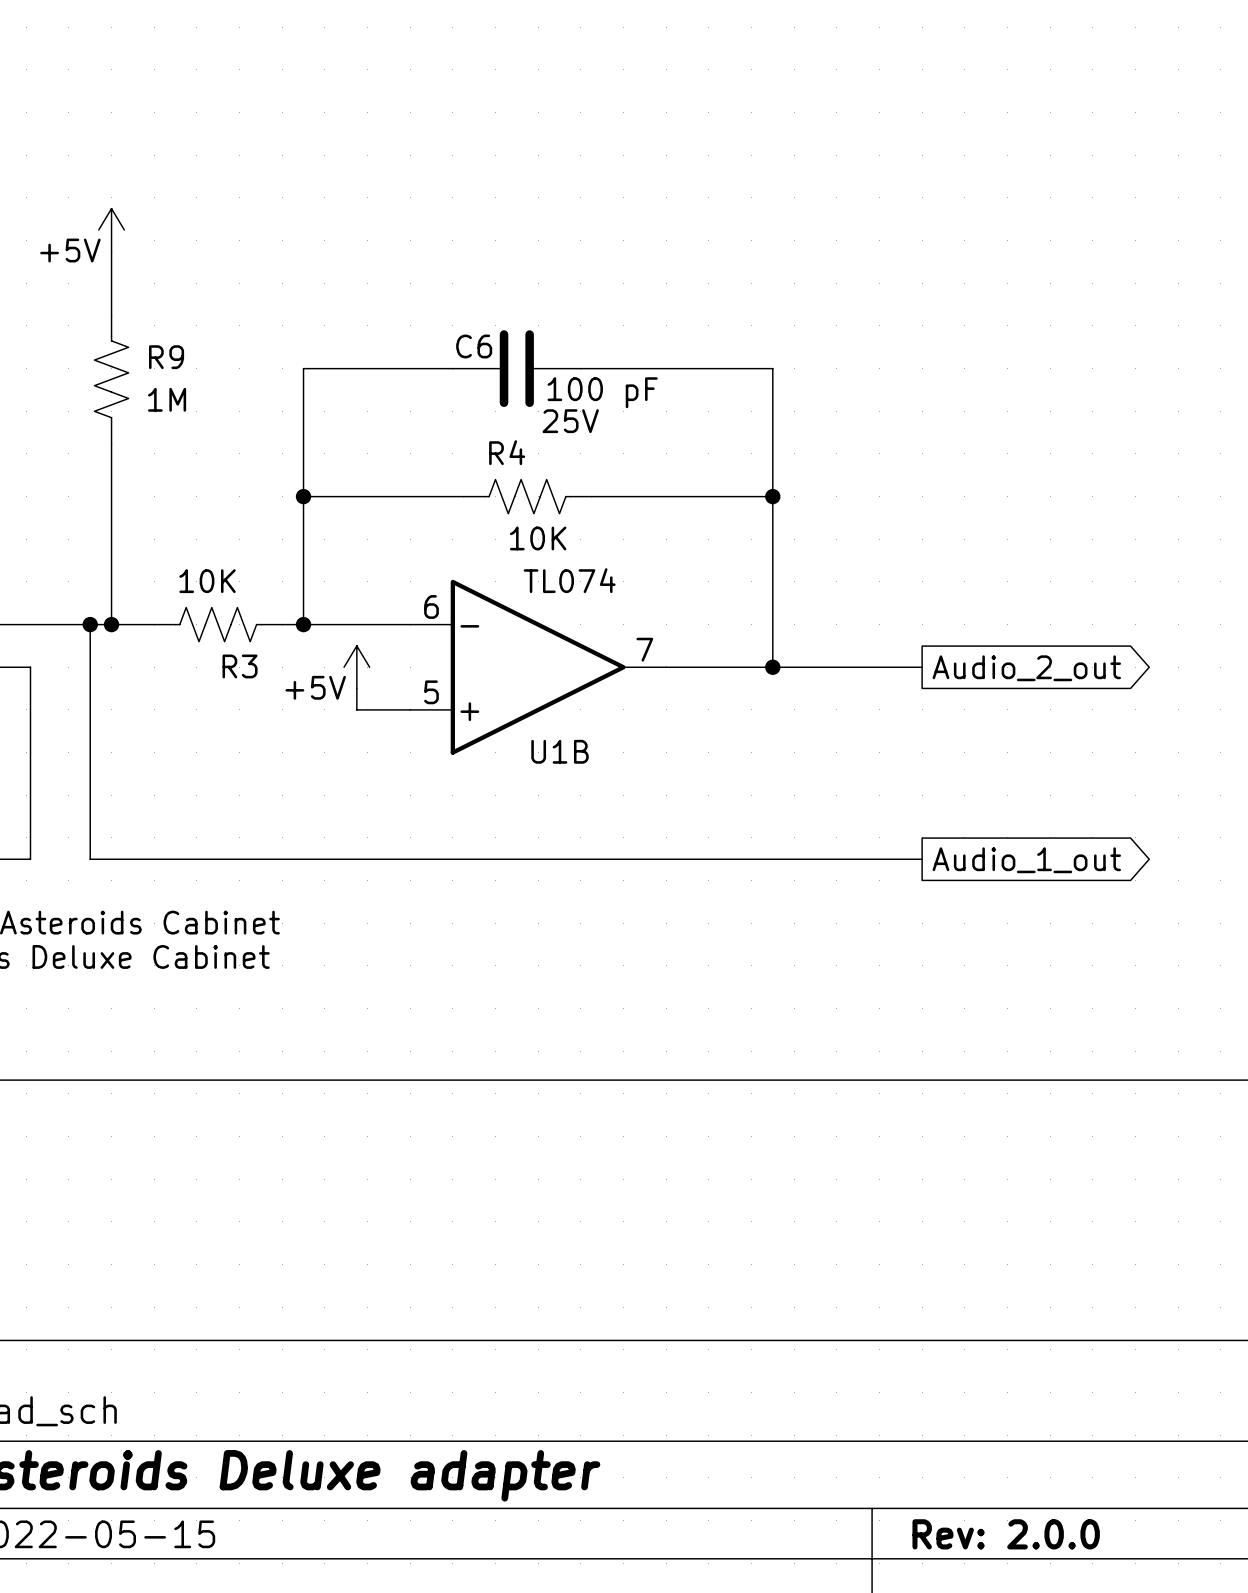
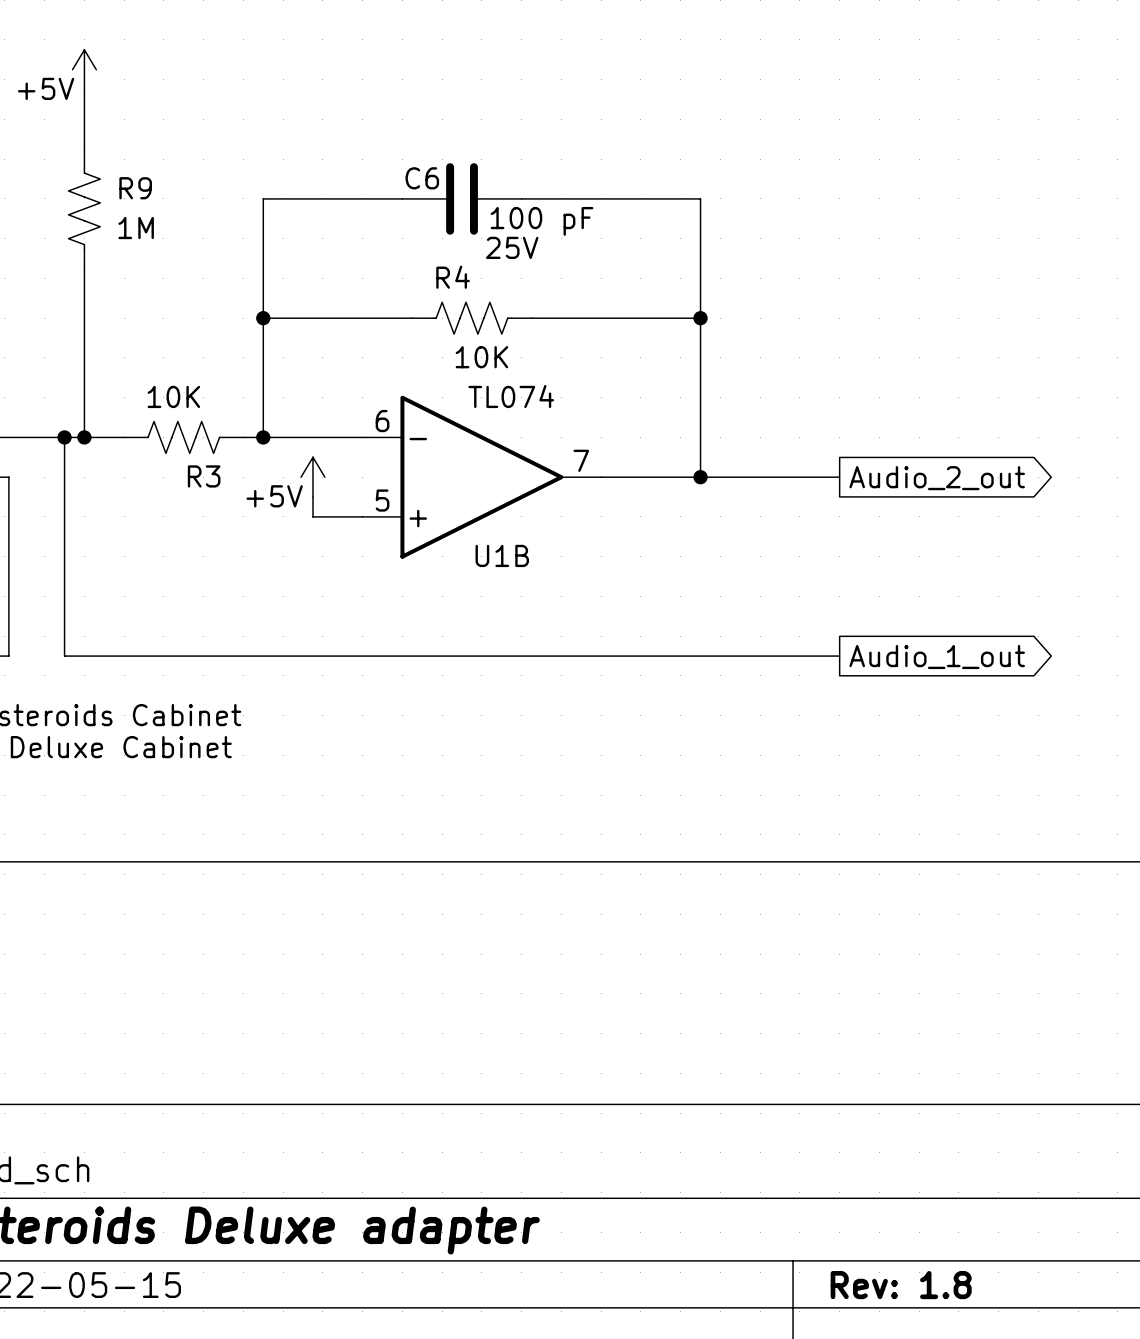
title block: Rev: 2.0.0 (1006, 1534) -> Rev: 1.8 (901, 1285)

